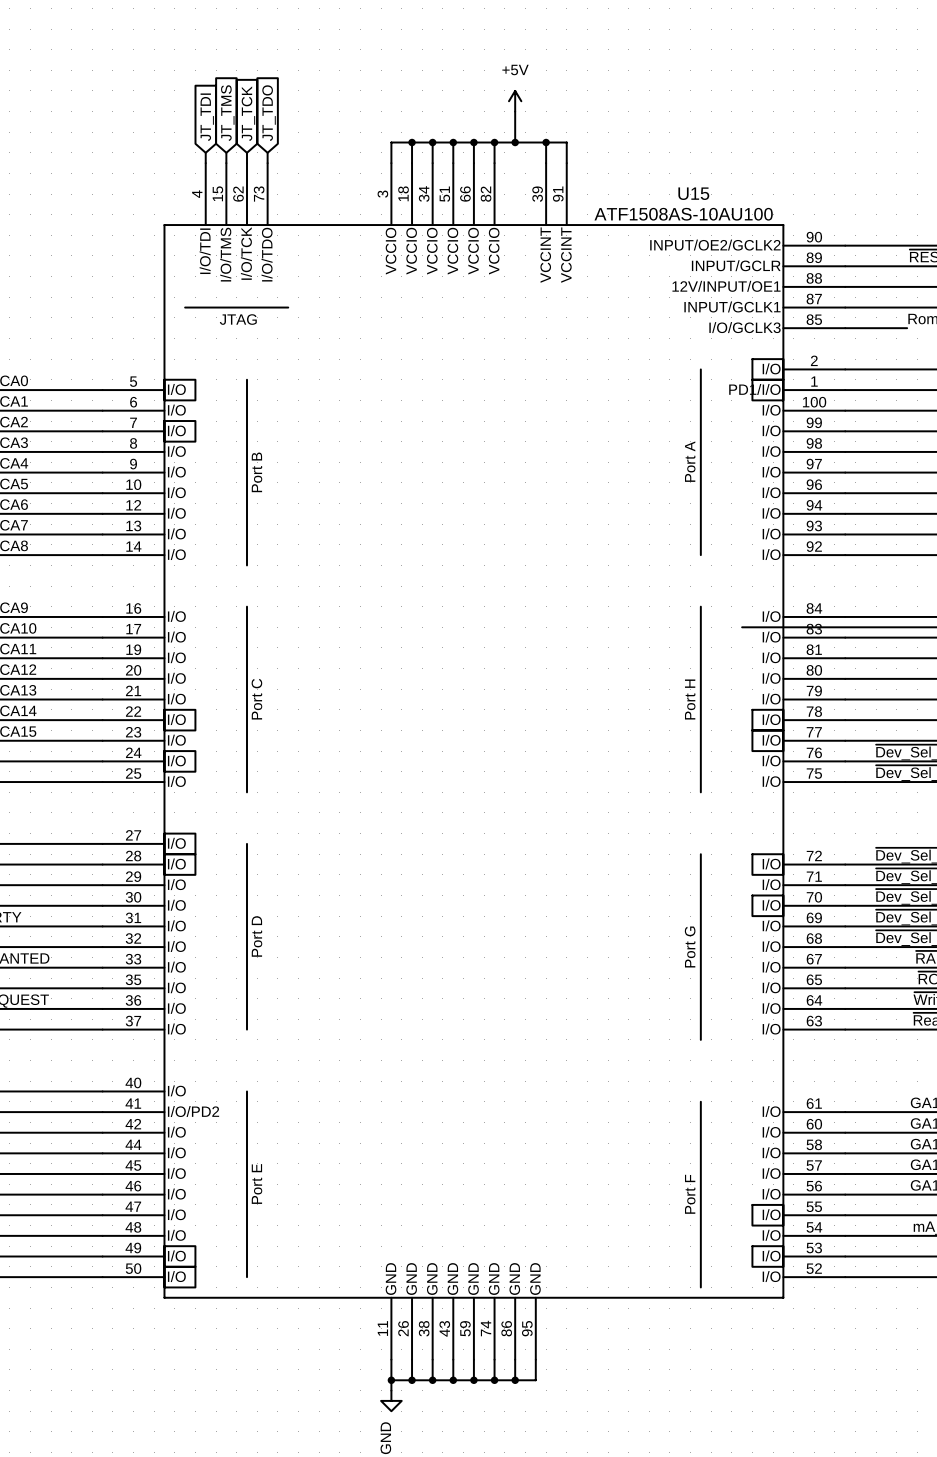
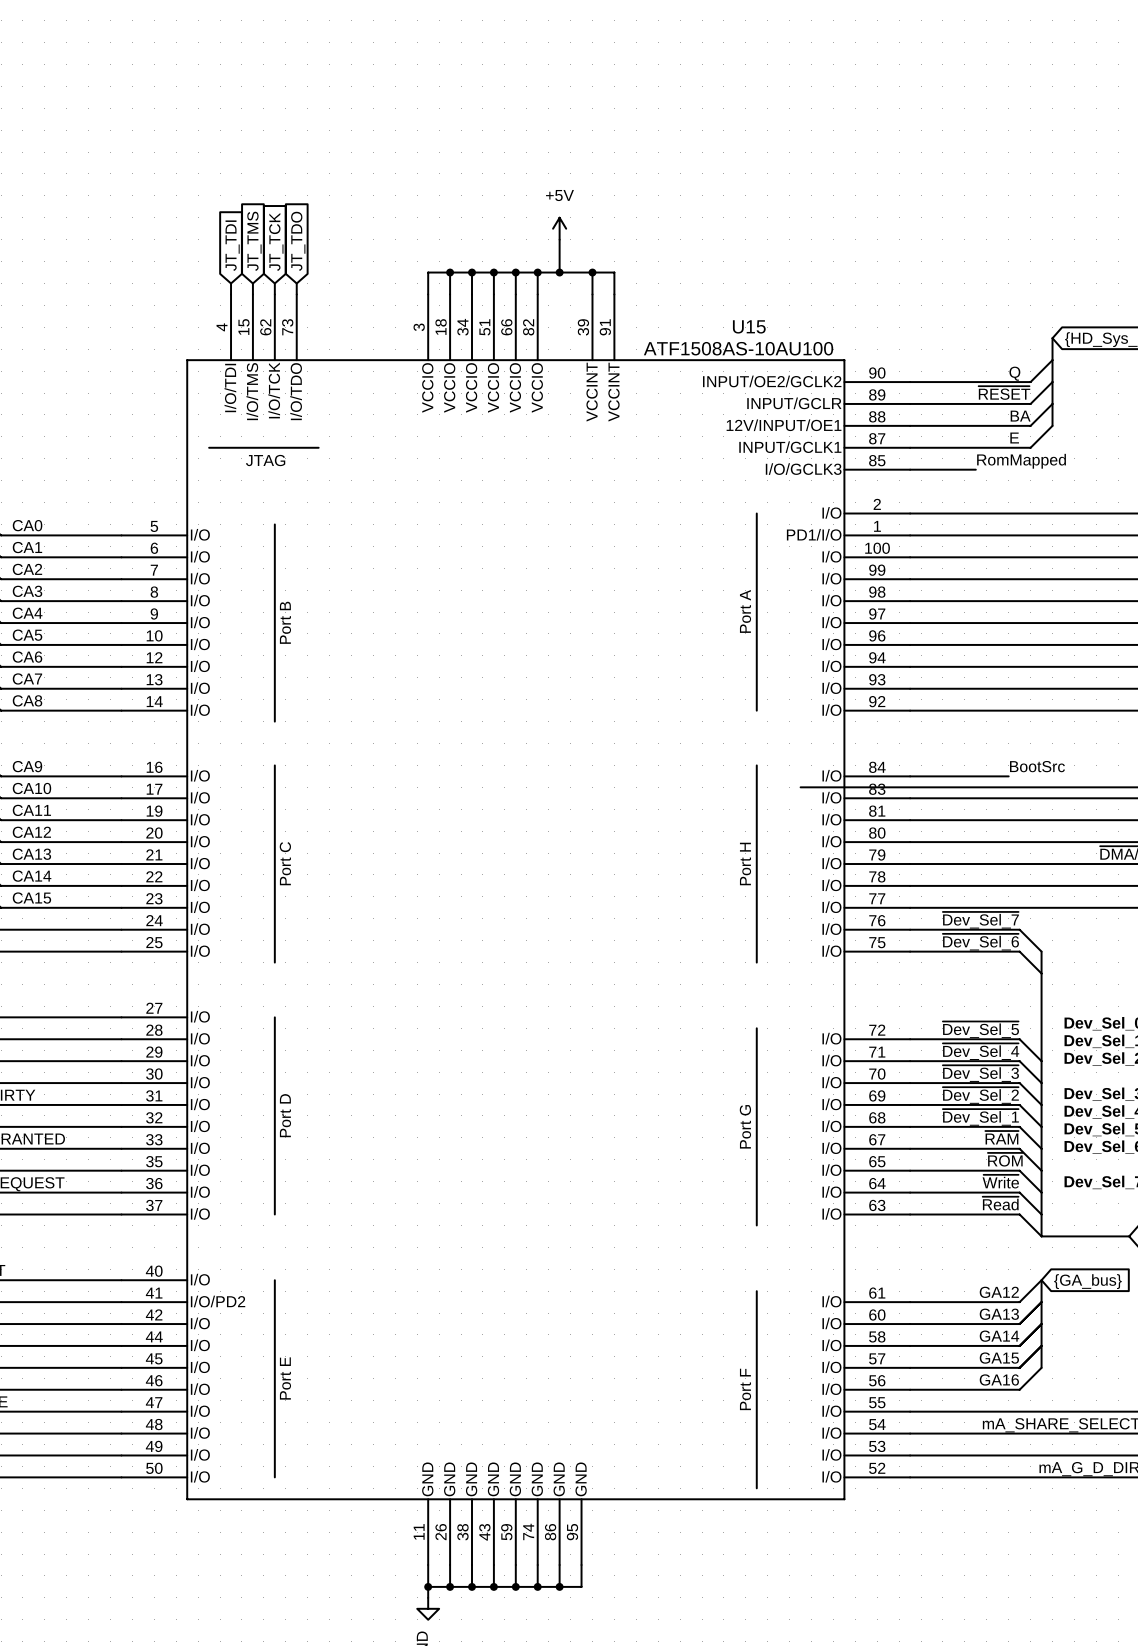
U15 symbol: [102, 163, 846, 1360] -> [121, 294, 911, 1566]

